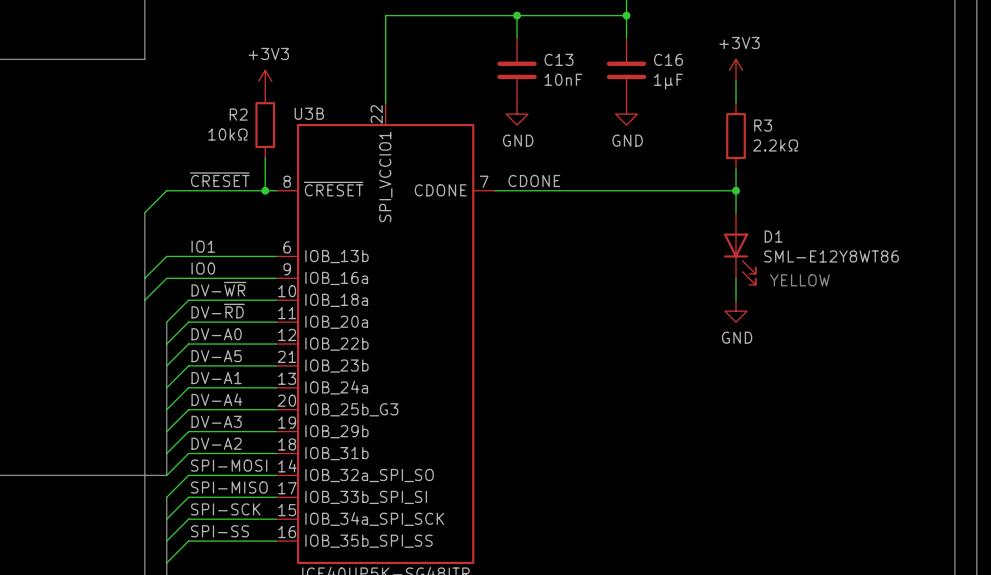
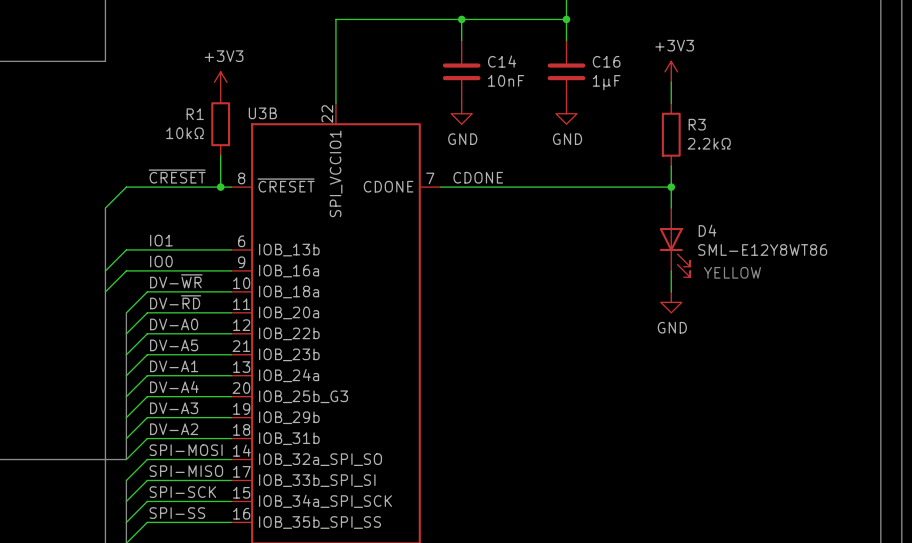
C13 name: C13 (558, 59) -> C14 (502, 61)
R2 name: R2 (238, 114) -> R1 (195, 114)
D1 name: D1 (773, 236) -> D4 (707, 230)

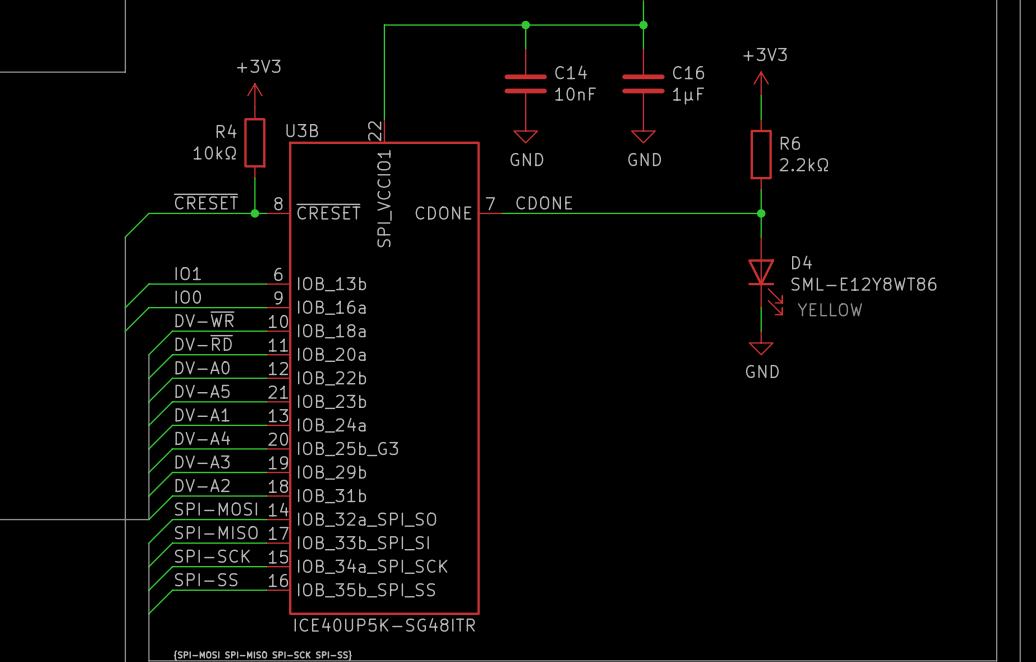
R1 name: R1 (195, 114) -> R4 (226, 131)
R3 name: R3 (697, 124) -> R6 (790, 143)

